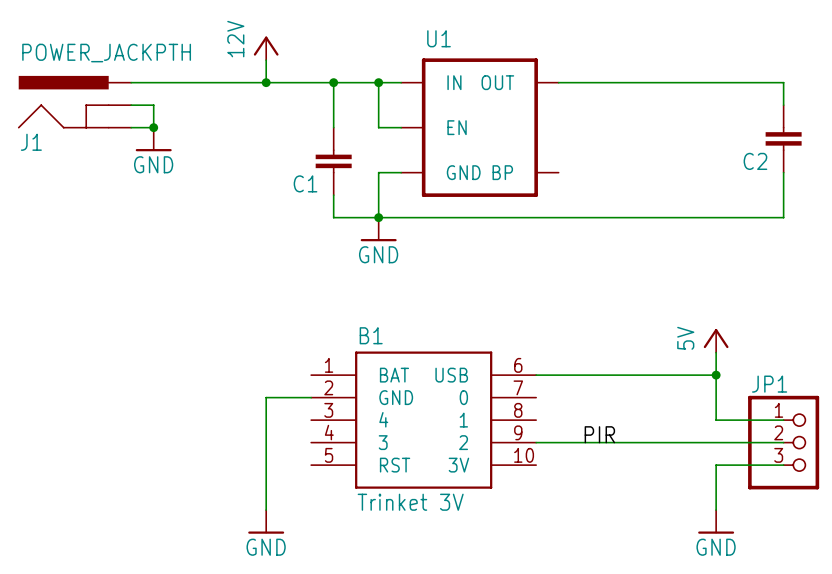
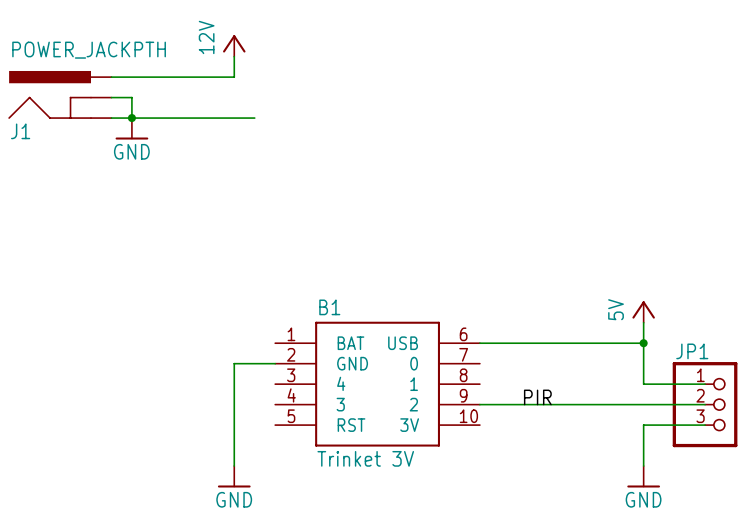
wire: (266, 82) (401, 82) -> (131, 118) (254, 118)
junction: (266, 82) -> none
wire: (333, 82) (333, 127) -> none
junction: (333, 82) -> none
wire: (378, 82) (378, 127) (401, 127) -> none
junction: (378, 82) -> none
wire: (558, 82) (783, 82) (783, 105) -> none
U1: (479, 127) -> none
C2: (783, 138) -> none
C1: (333, 161) -> none
wire: (401, 172) (378, 172) (378, 217) -> none
wire: (783, 172) (783, 217) (333, 217) (333, 195) -> none
junction: (378, 217) -> none
power symbol: GND (378, 229) -> none

